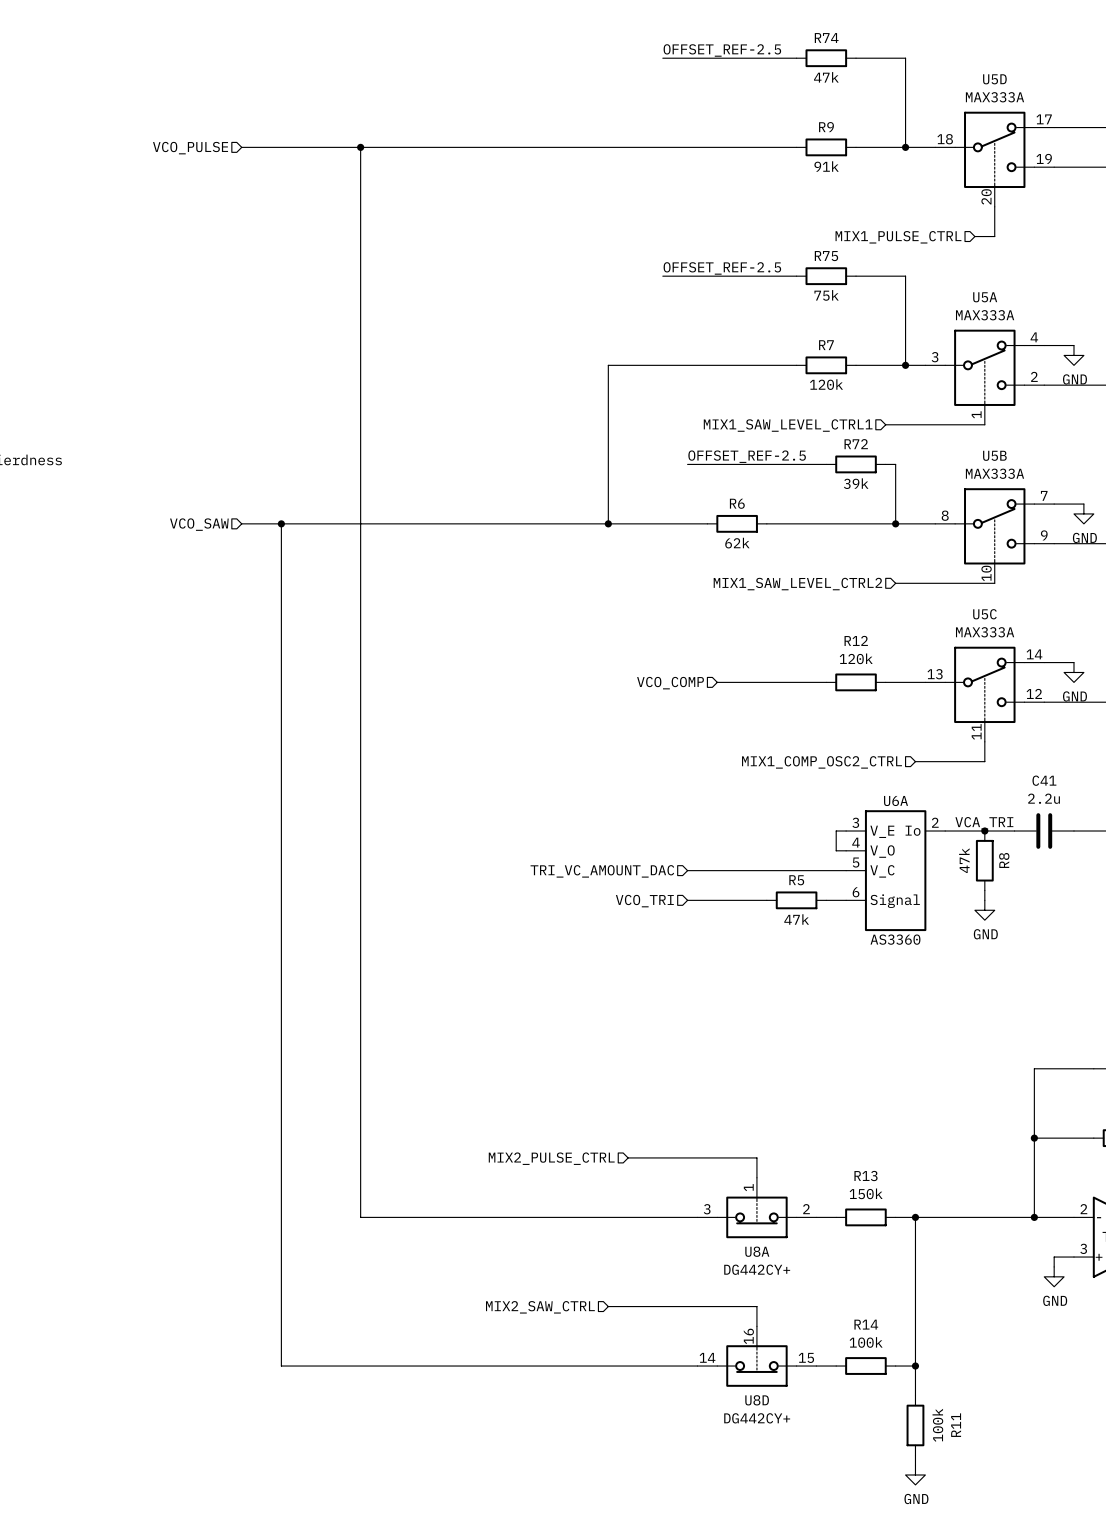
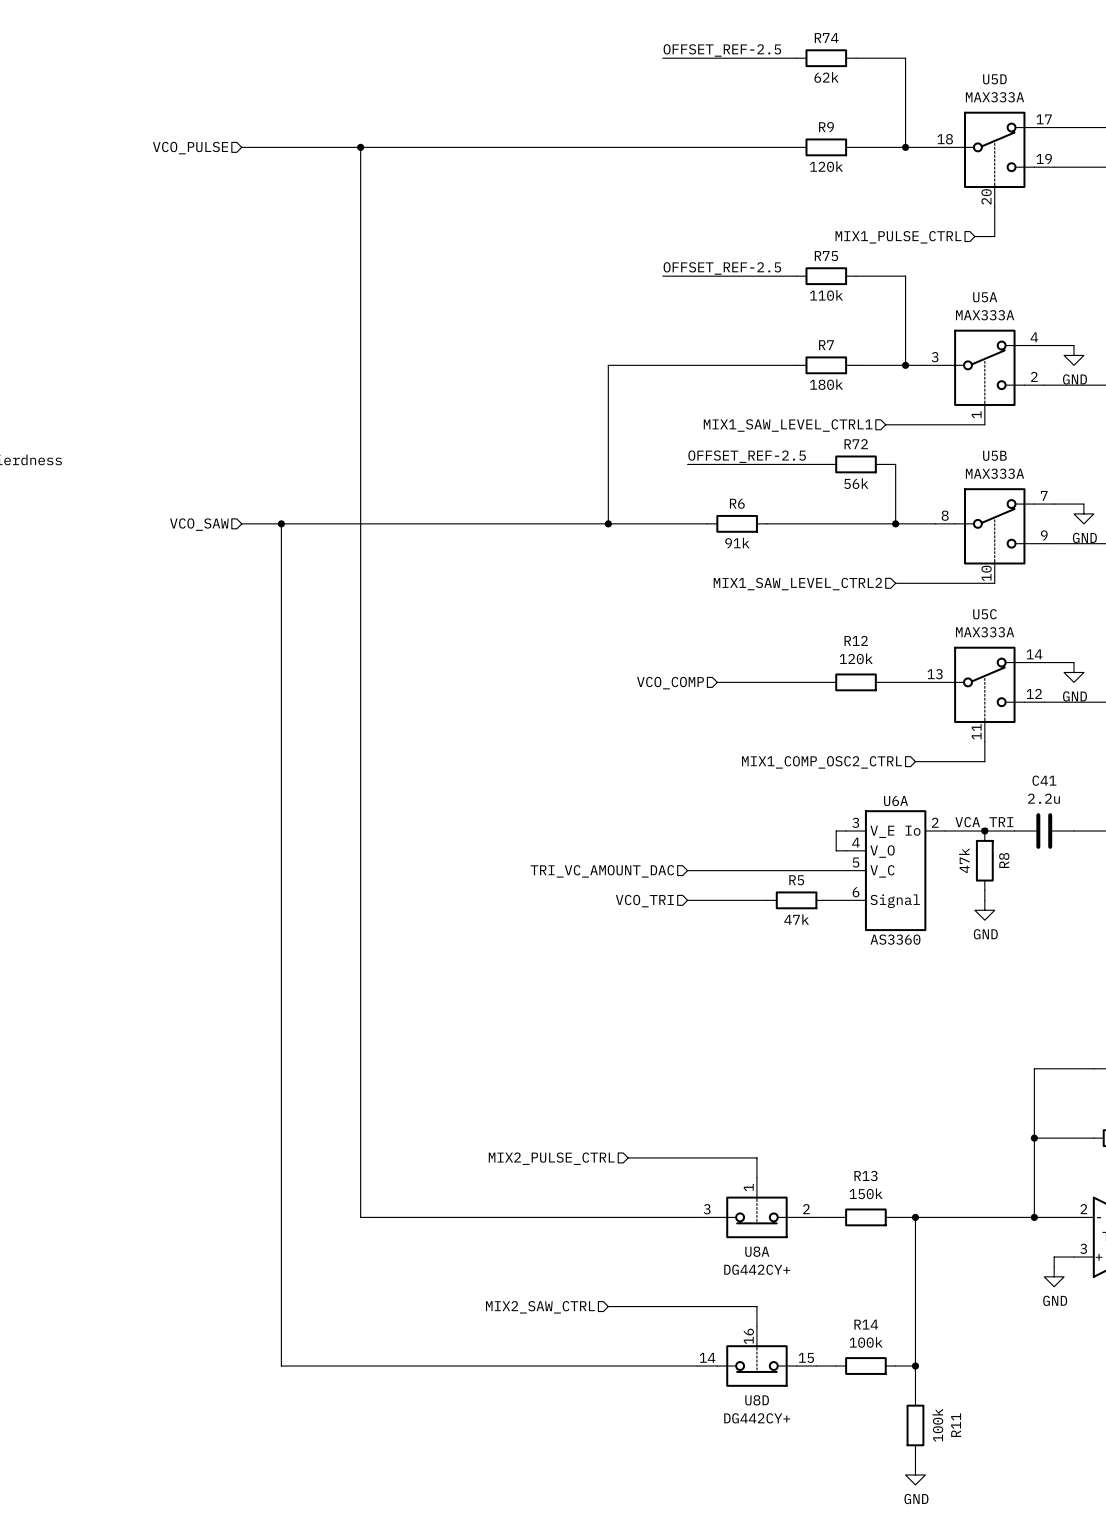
R74 value: 47k (826, 77) -> 62k (826, 77)
R9 value: 91k (826, 166) -> 120k (826, 166)
R75 value: 75k (826, 295) -> 110k (826, 295)
R7 value: 120k (826, 384) -> 180k (826, 384)
R72 value: 39k (856, 483) -> 56k (856, 483)
R6 value: 62k (737, 543) -> 91k (737, 543)

